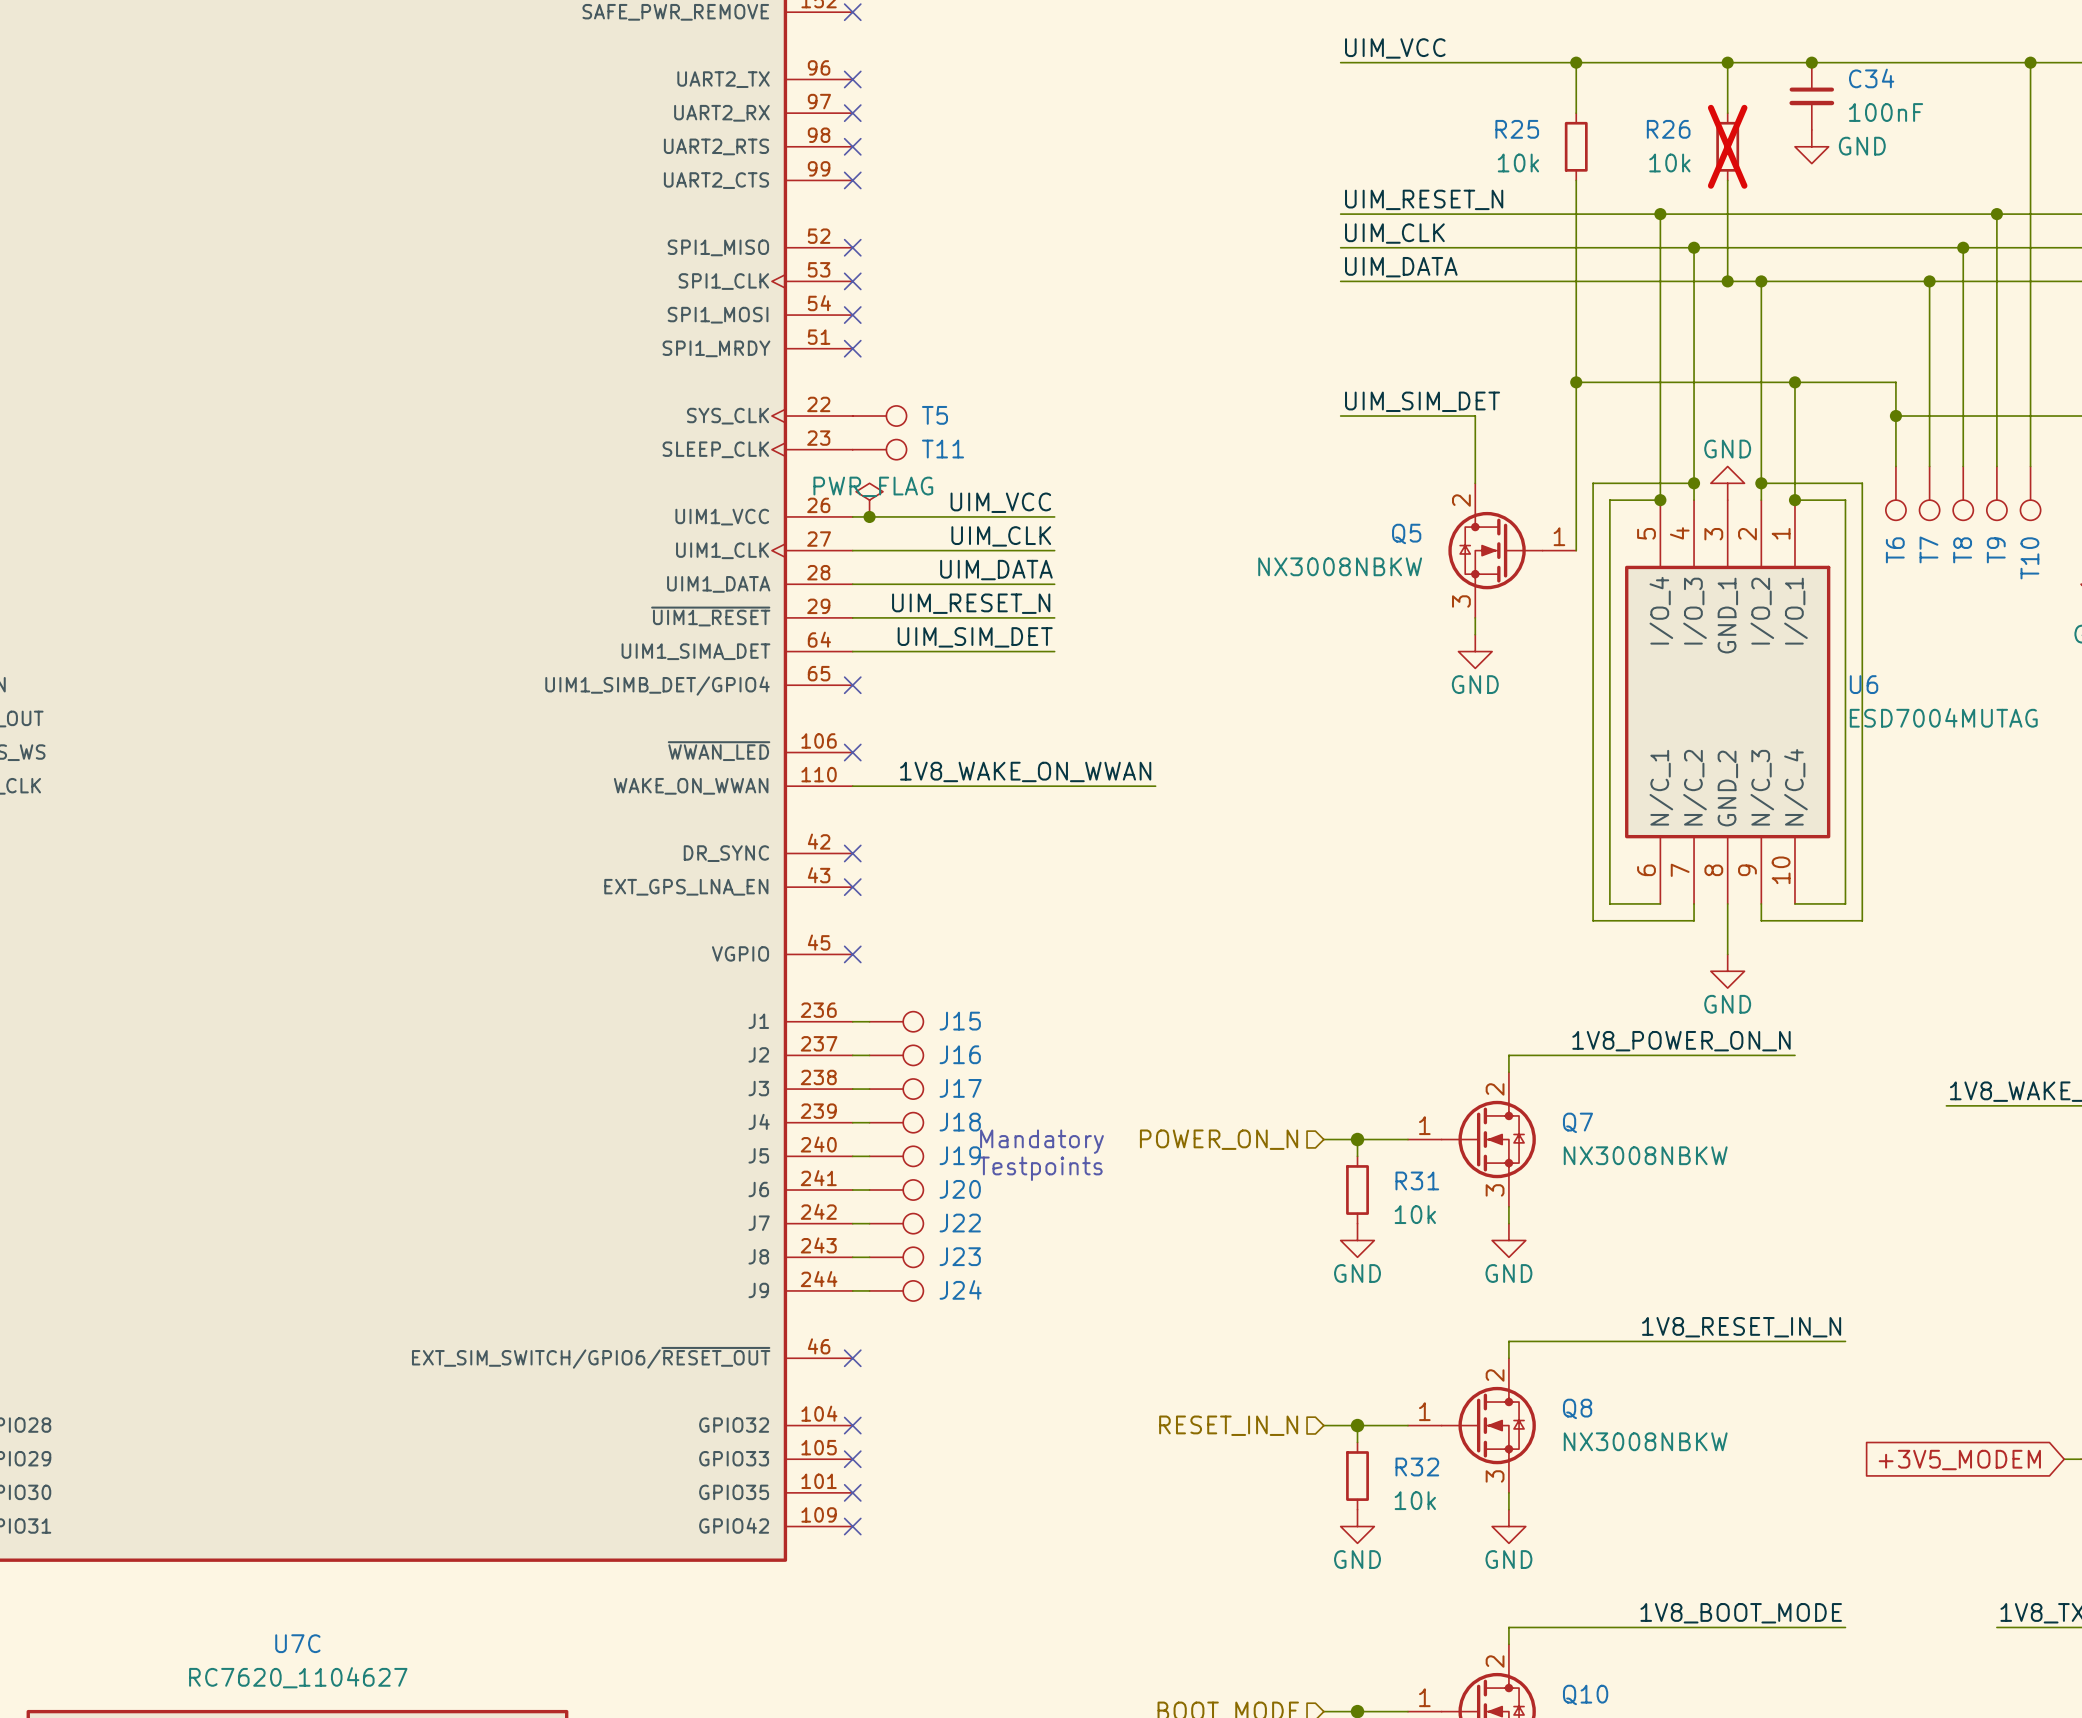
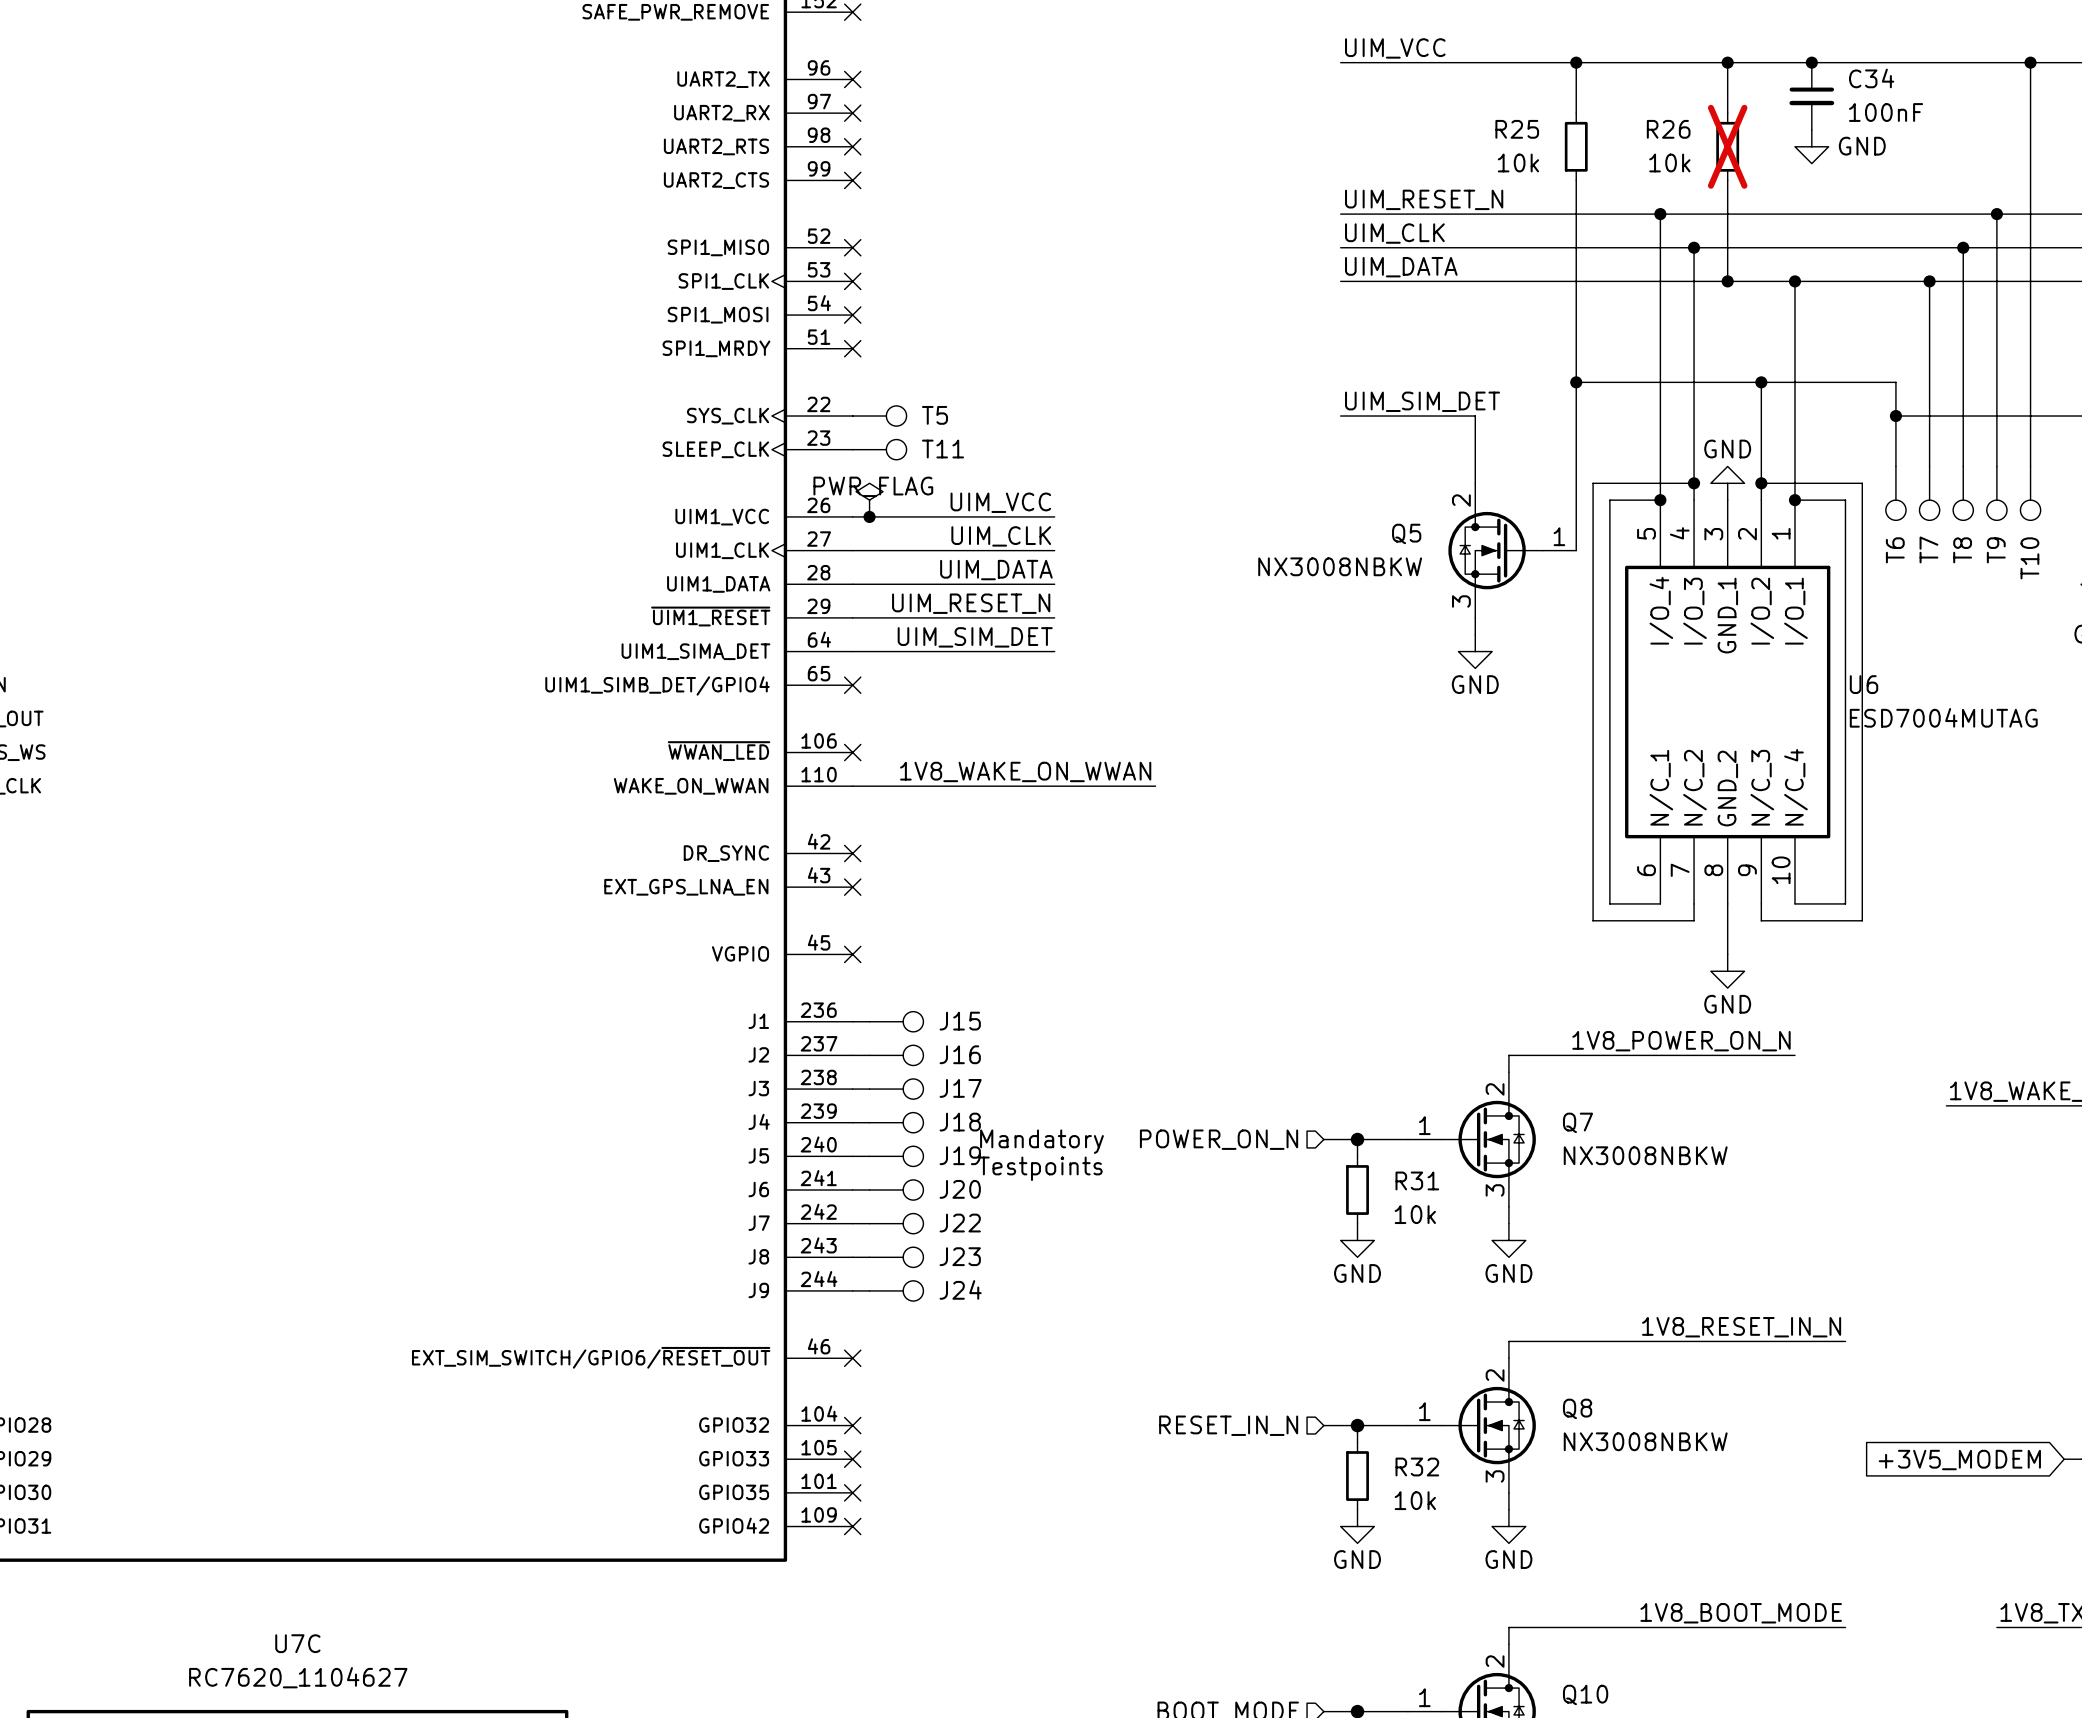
wire: (1761, 281) (1761, 382) -> (1794, 281) (1794, 382)
junction position: (1761, 281) -> (1794, 281)
junction position: (1794, 382) -> (1761, 382)

